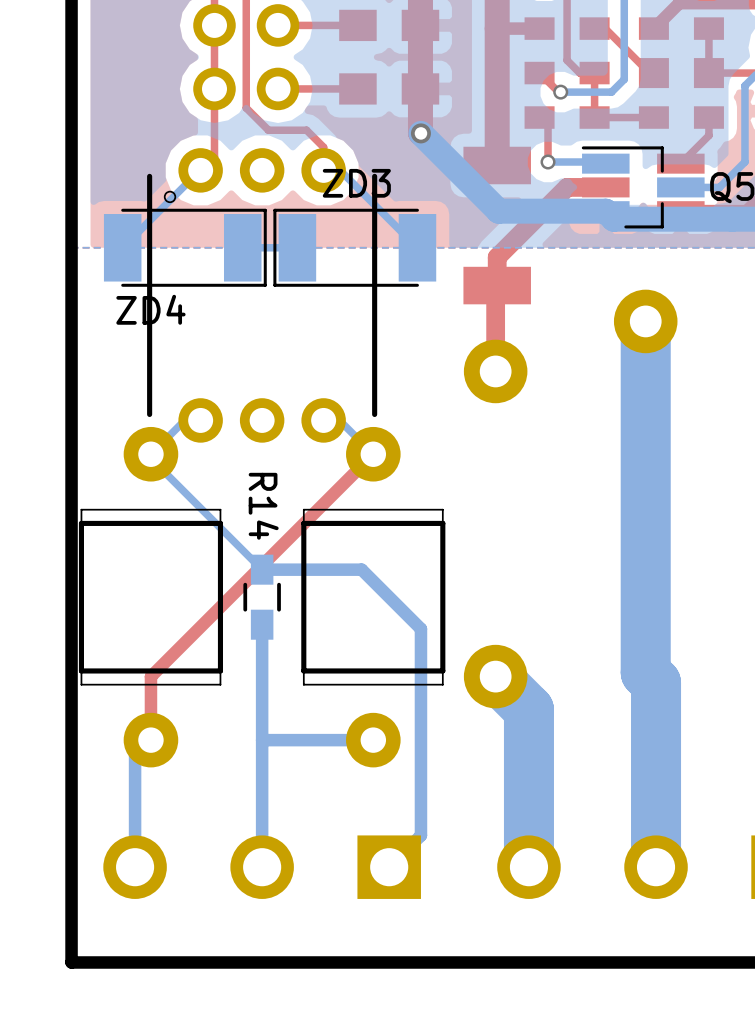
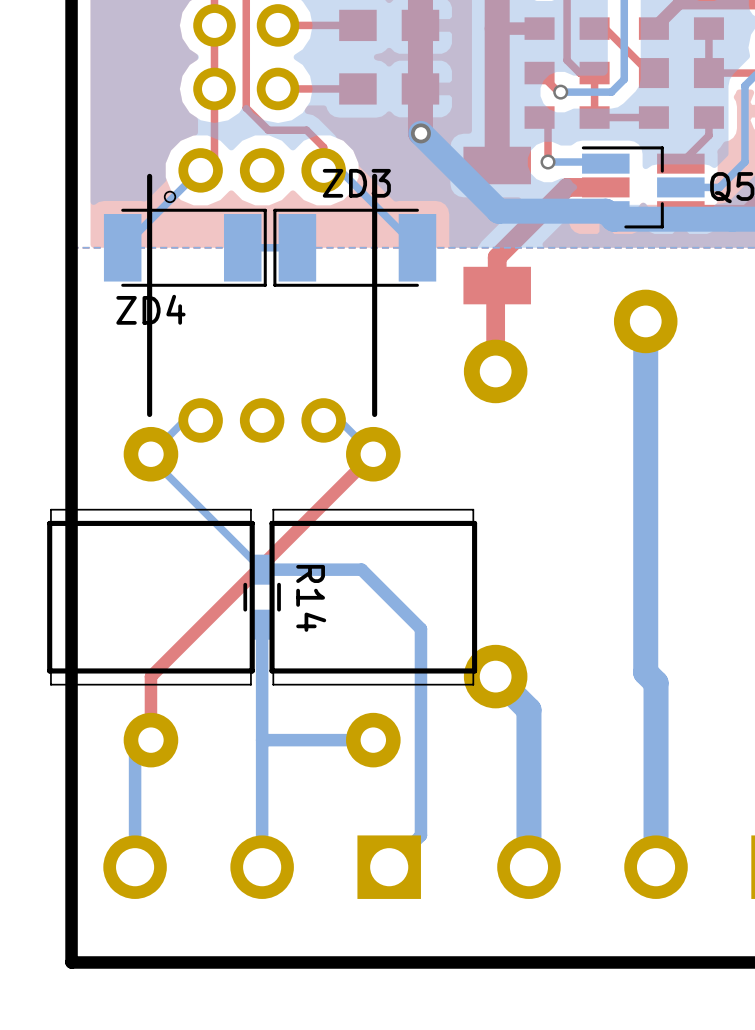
bottom track width: thick (645, 321) (645, 672) (656, 682) (656, 867) -> thin (645, 321) (645, 672) (656, 682) (656, 867)
part footprint: [78, 426, 224, 768] -> [47, 426, 255, 768]
part footprint: [301, 426, 446, 768] -> [269, 426, 478, 768]
R14 name position: R14 (263, 506) -> R14 (311, 598)
bottom track width: thick (495, 676) (528, 709) (528, 867) -> thin (495, 676) (528, 709) (528, 867)

